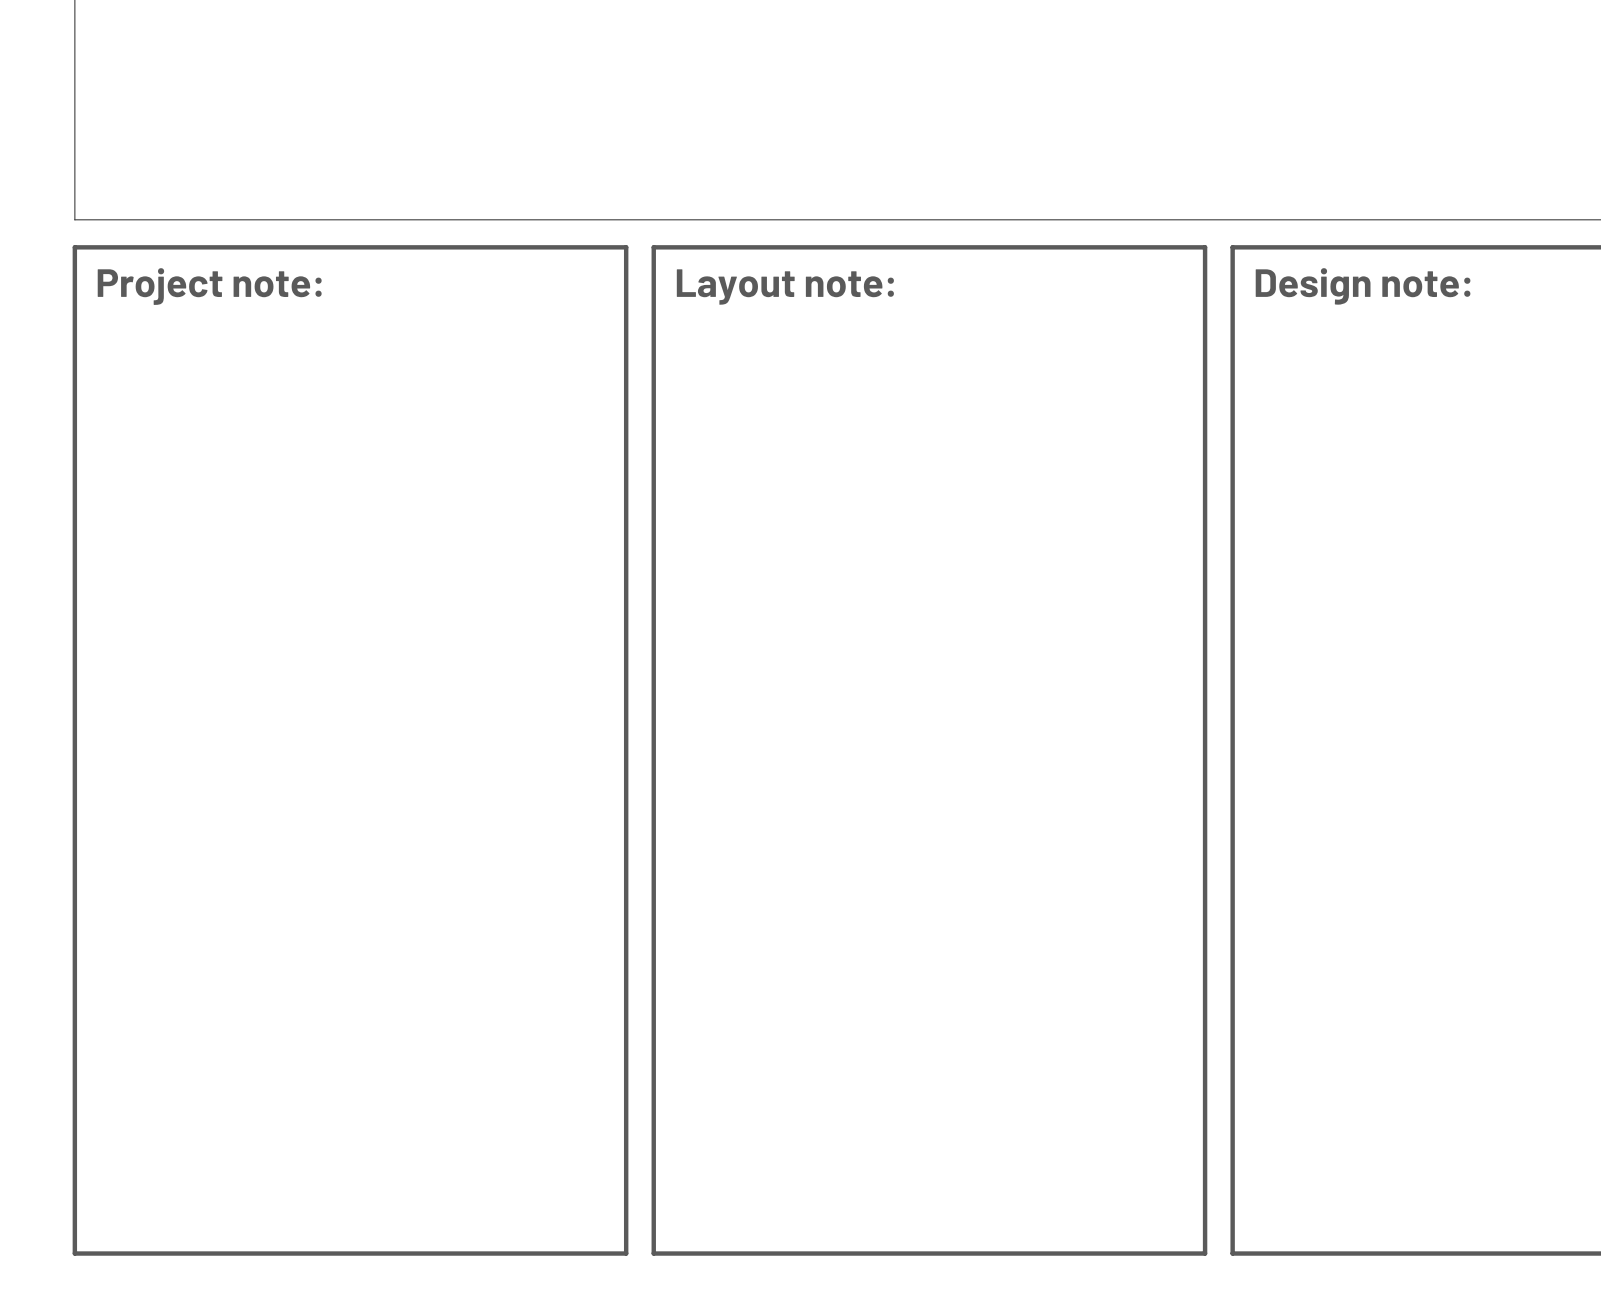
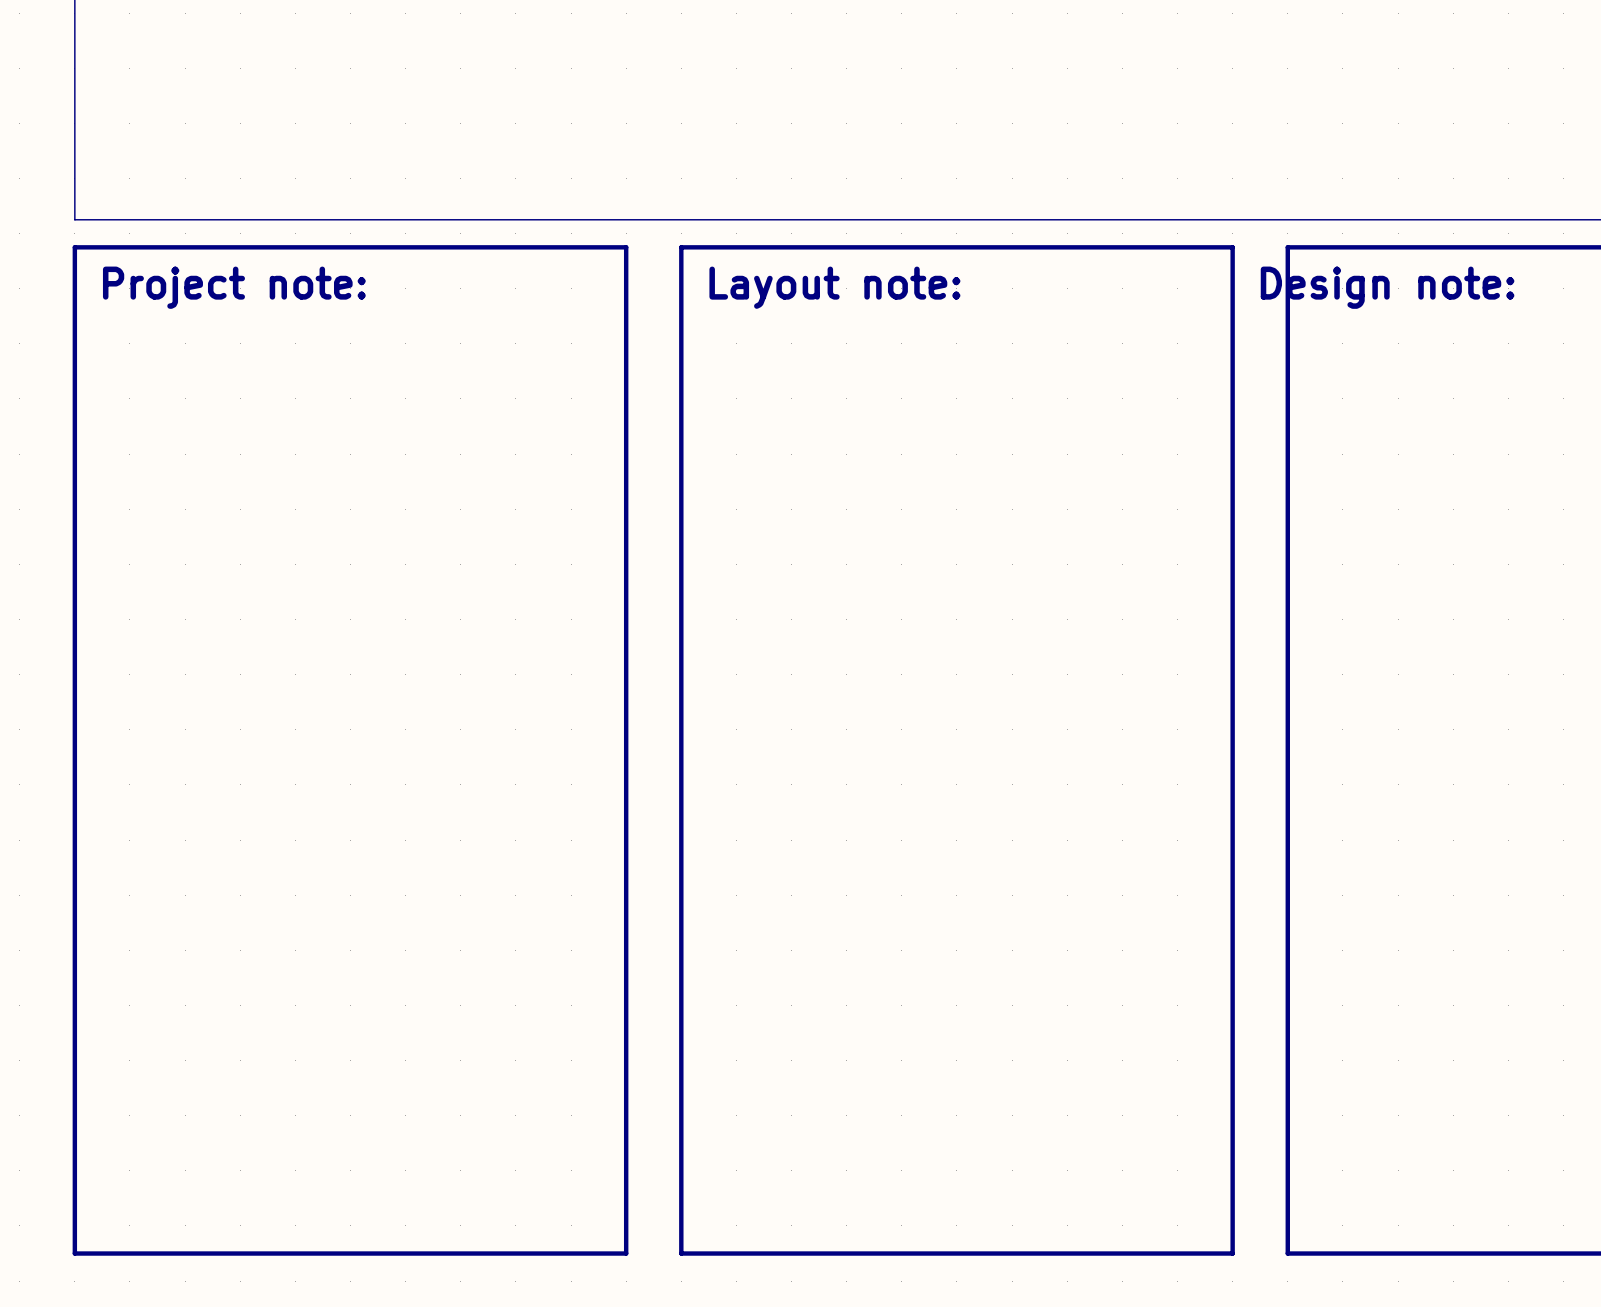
line: (681, 247) (653, 247) (653, 1253) (681, 1253) -> (681, 247) (681, 1253)
line: (1205, 247) (1205, 1253) -> (1287, 247) (1287, 1253)
line: (1232, 247) (1287, 247) -> (1232, 247) (1205, 247)
text position: Layout note: (785, 287) -> Layout note: (834, 287)
line: (1232, 1253) (1287, 1253) -> (1232, 1253) (1205, 1253)

